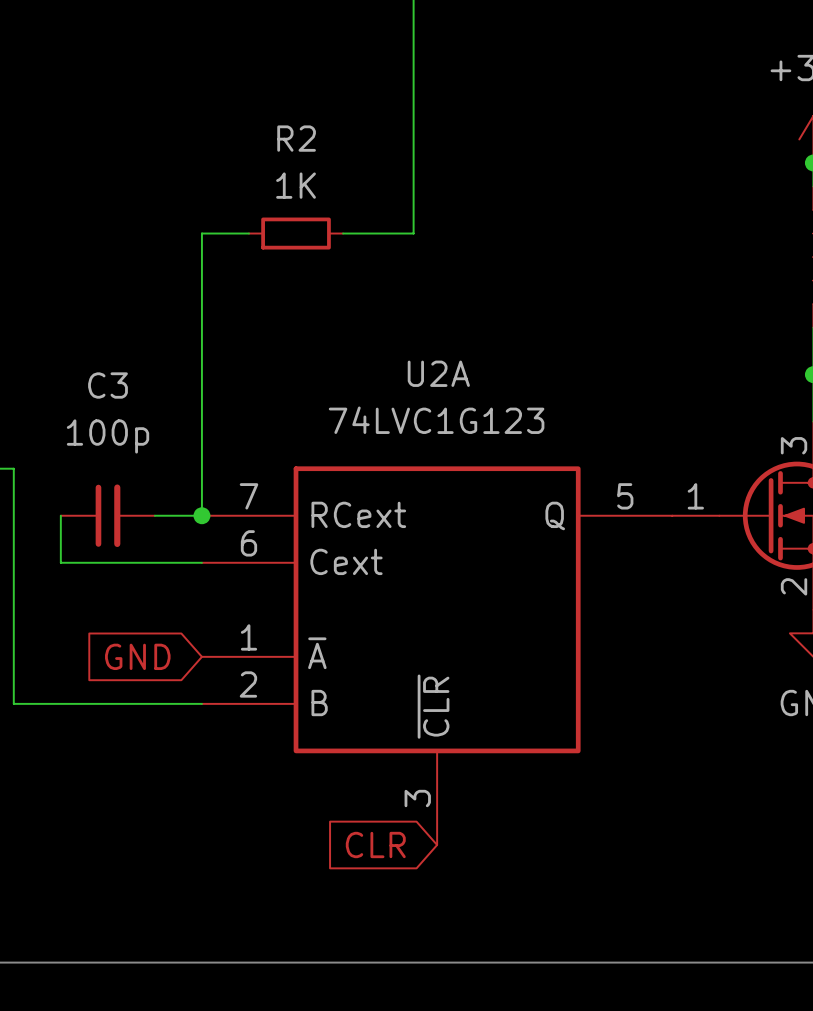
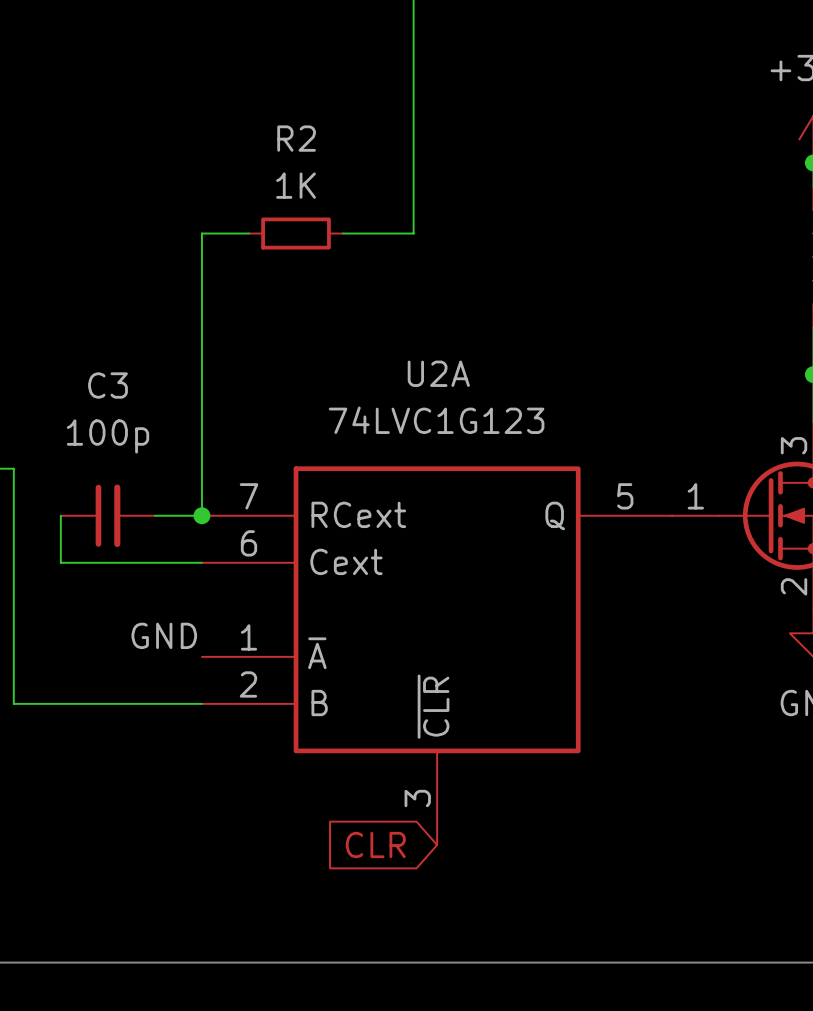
label: none -> GND (164, 635)
global label: GND (137, 656) -> none

